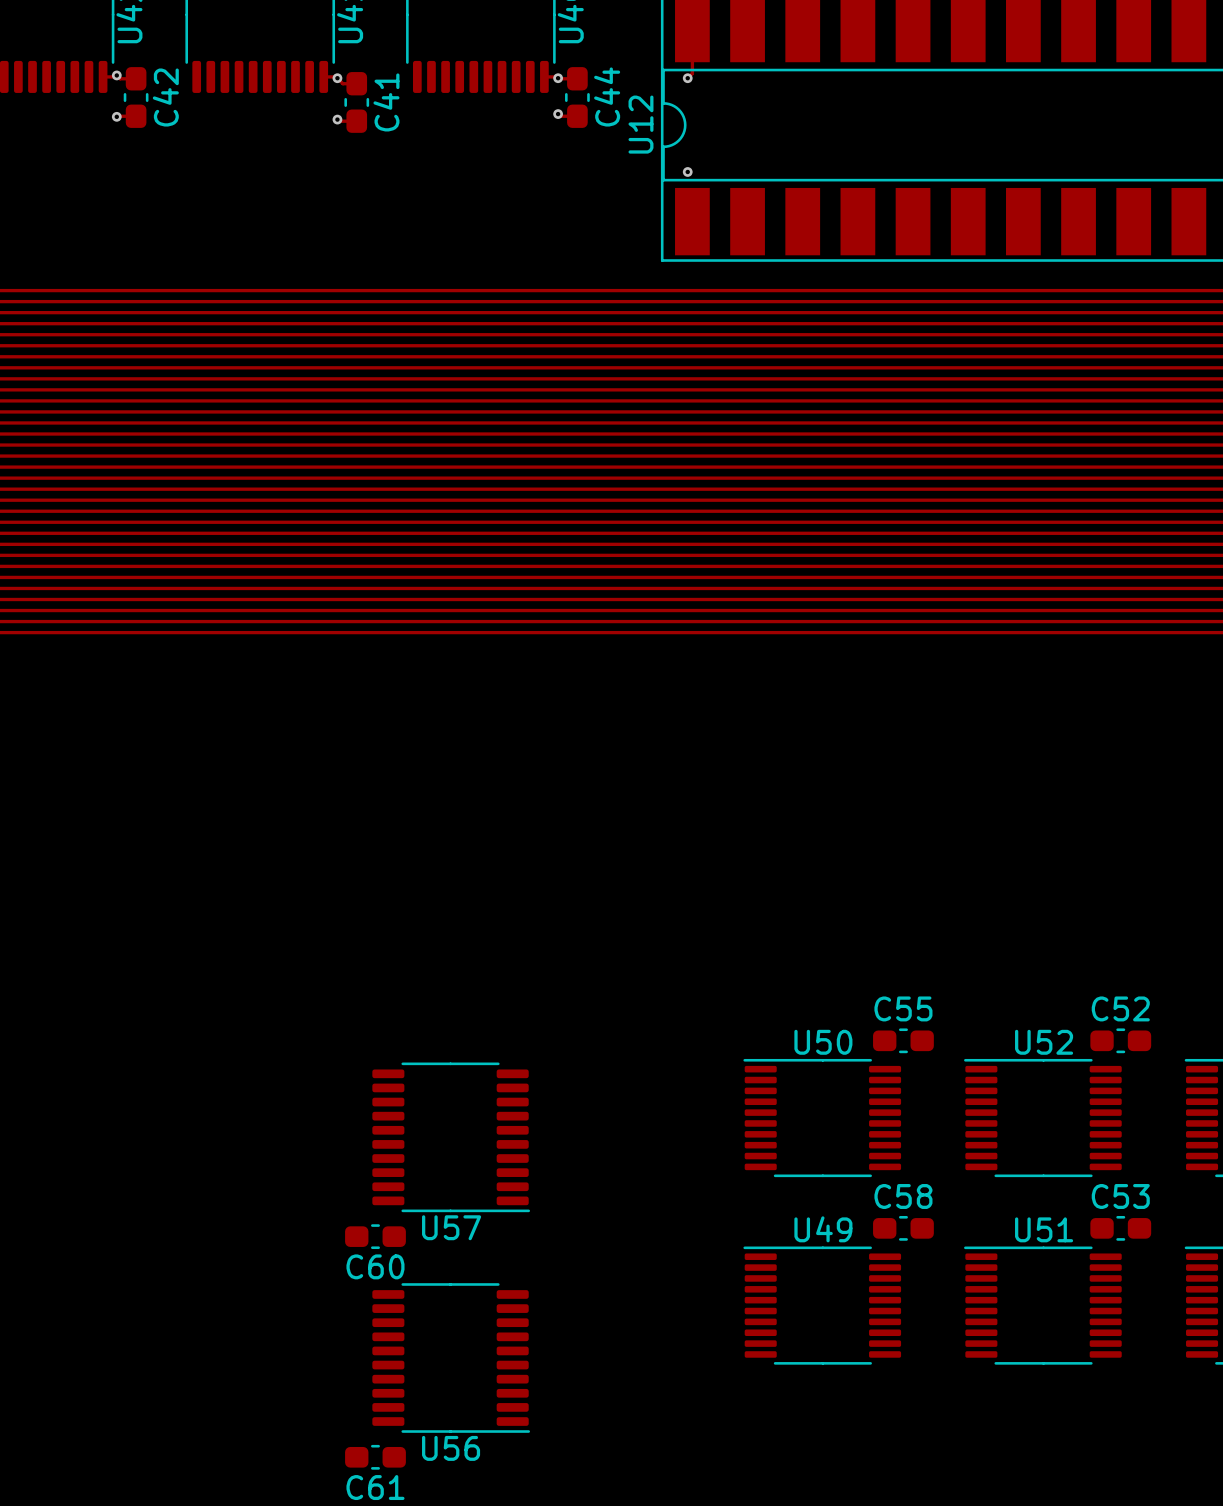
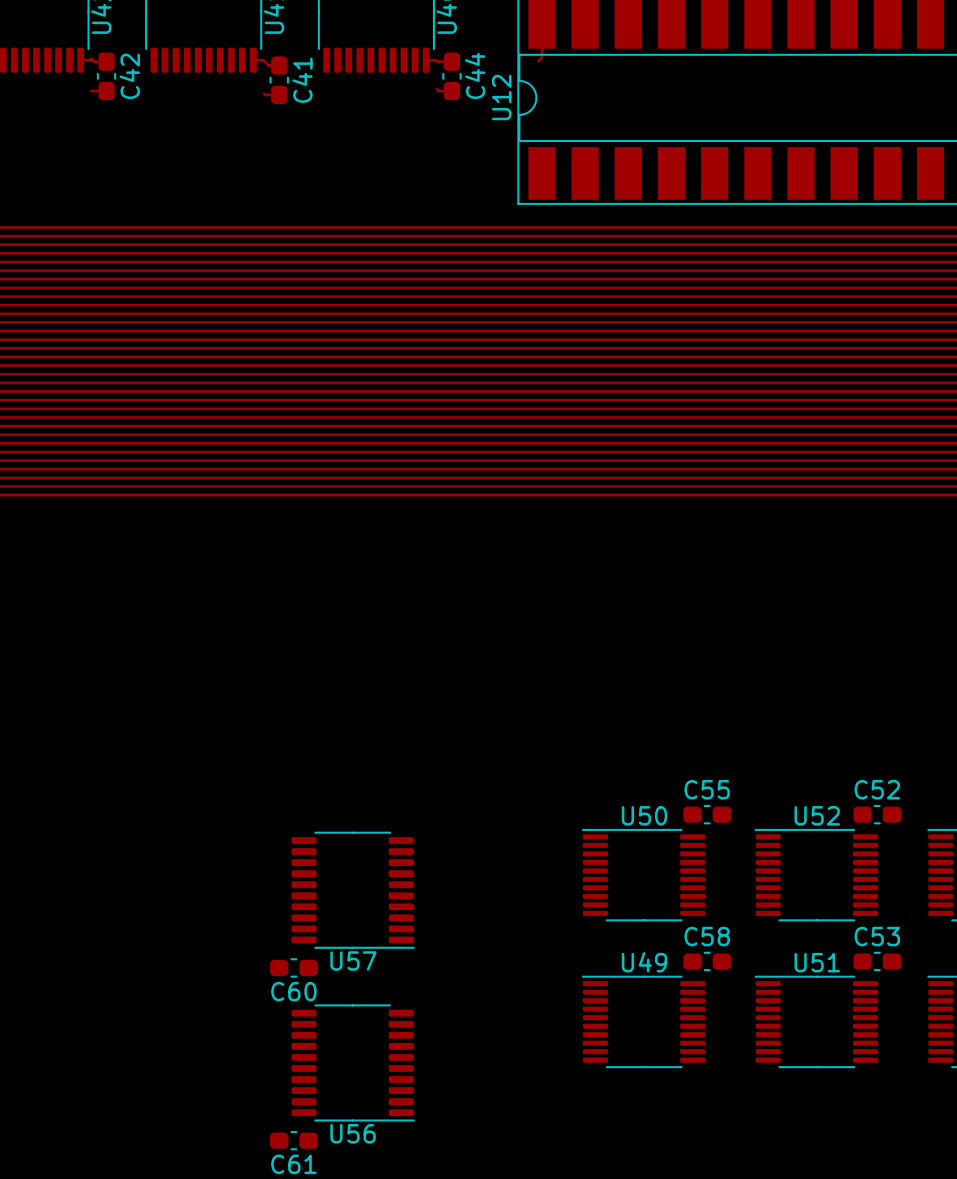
via: (116, 75) -> none
via: (337, 78) -> none
via: (558, 78) -> none
via: (687, 78) -> none
via: (558, 114) -> none
via: (116, 116) -> none
via: (337, 119) -> none
via: (687, 171) -> none

